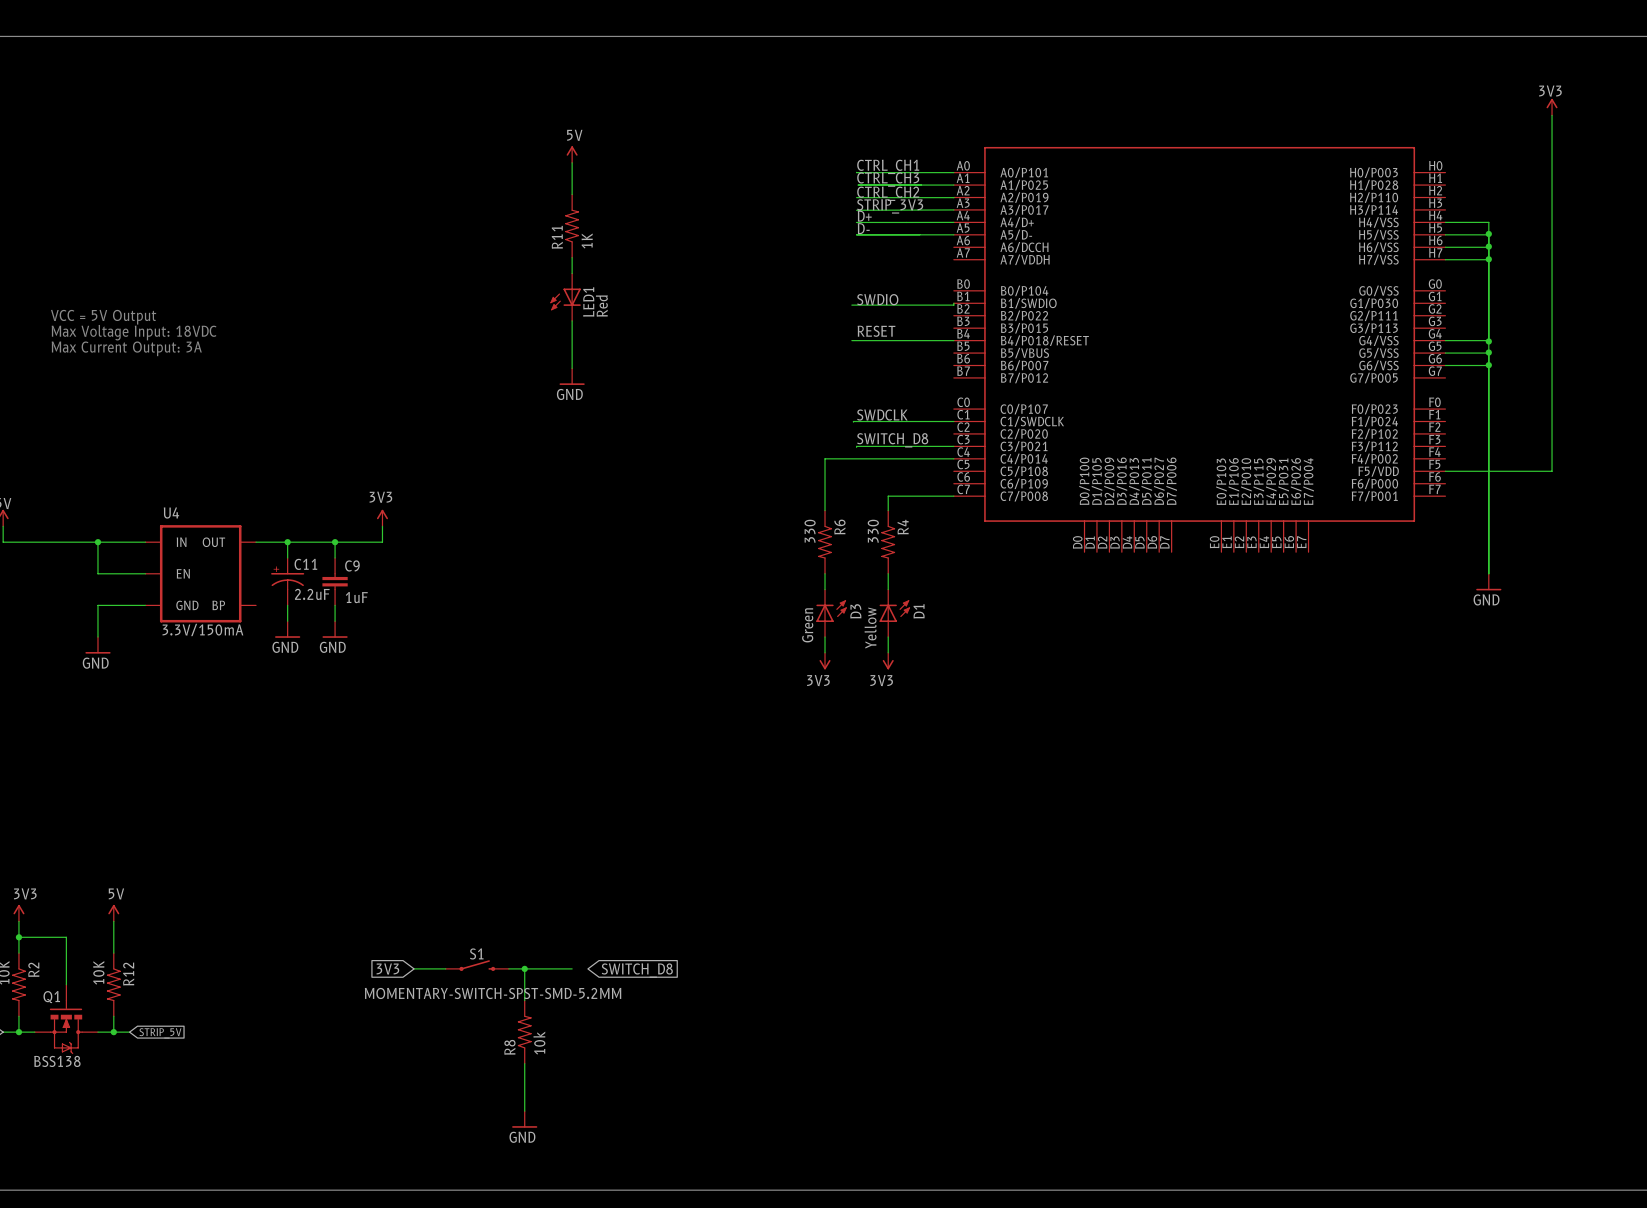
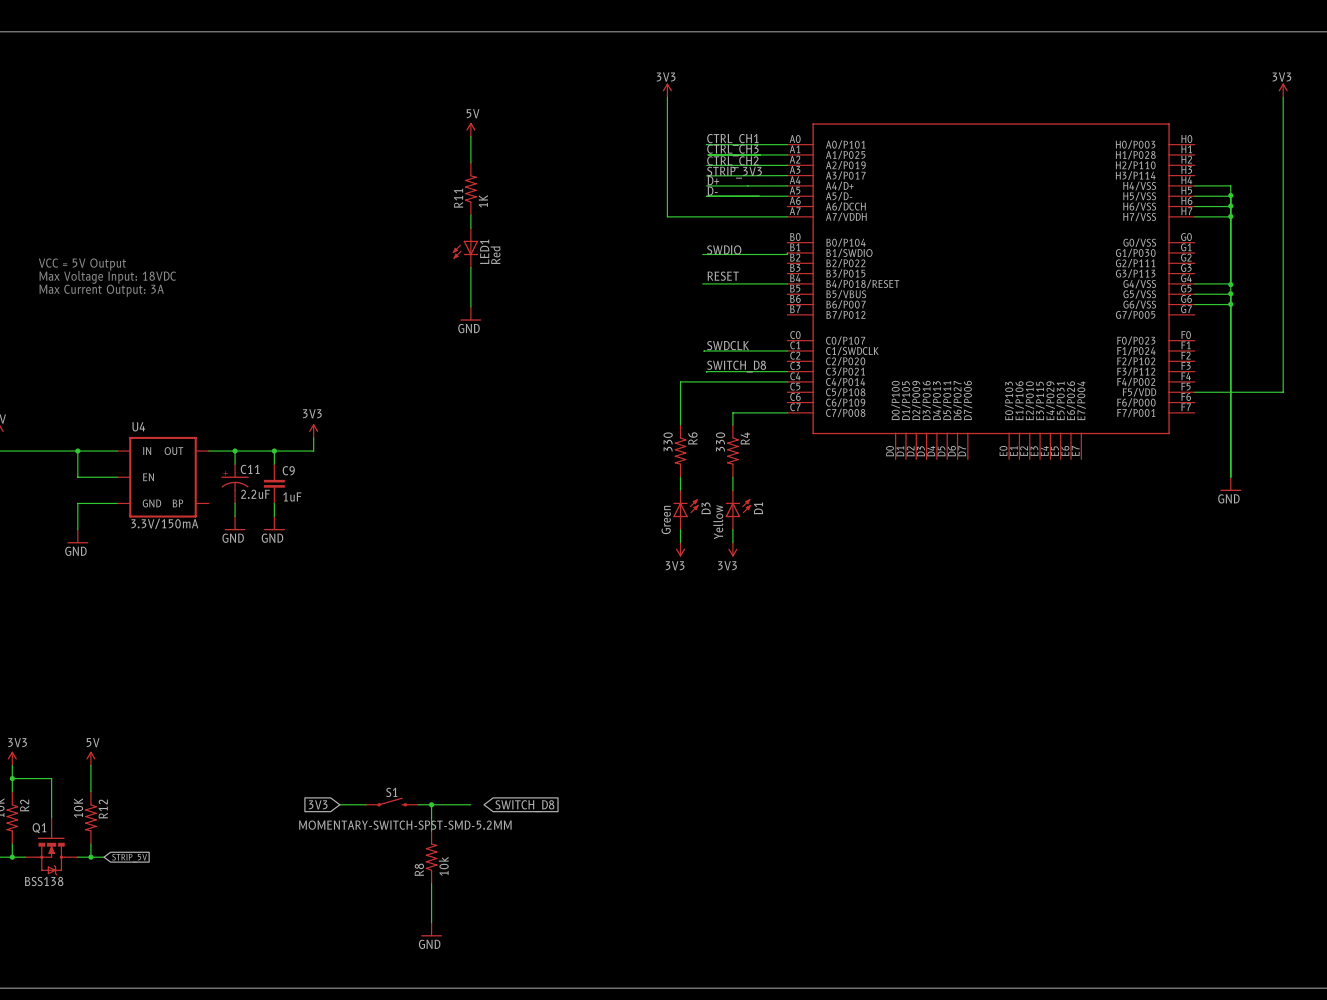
power symbol: none -> 3V3 (667, 90)
wire: none -> (667, 97) (667, 216) (787, 216)

